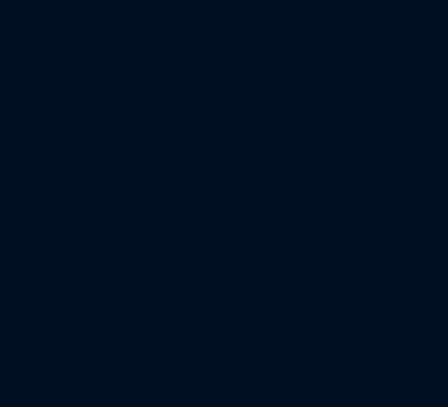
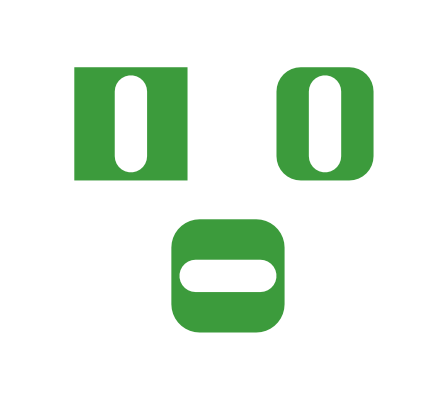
part: none -> (223, 199)

